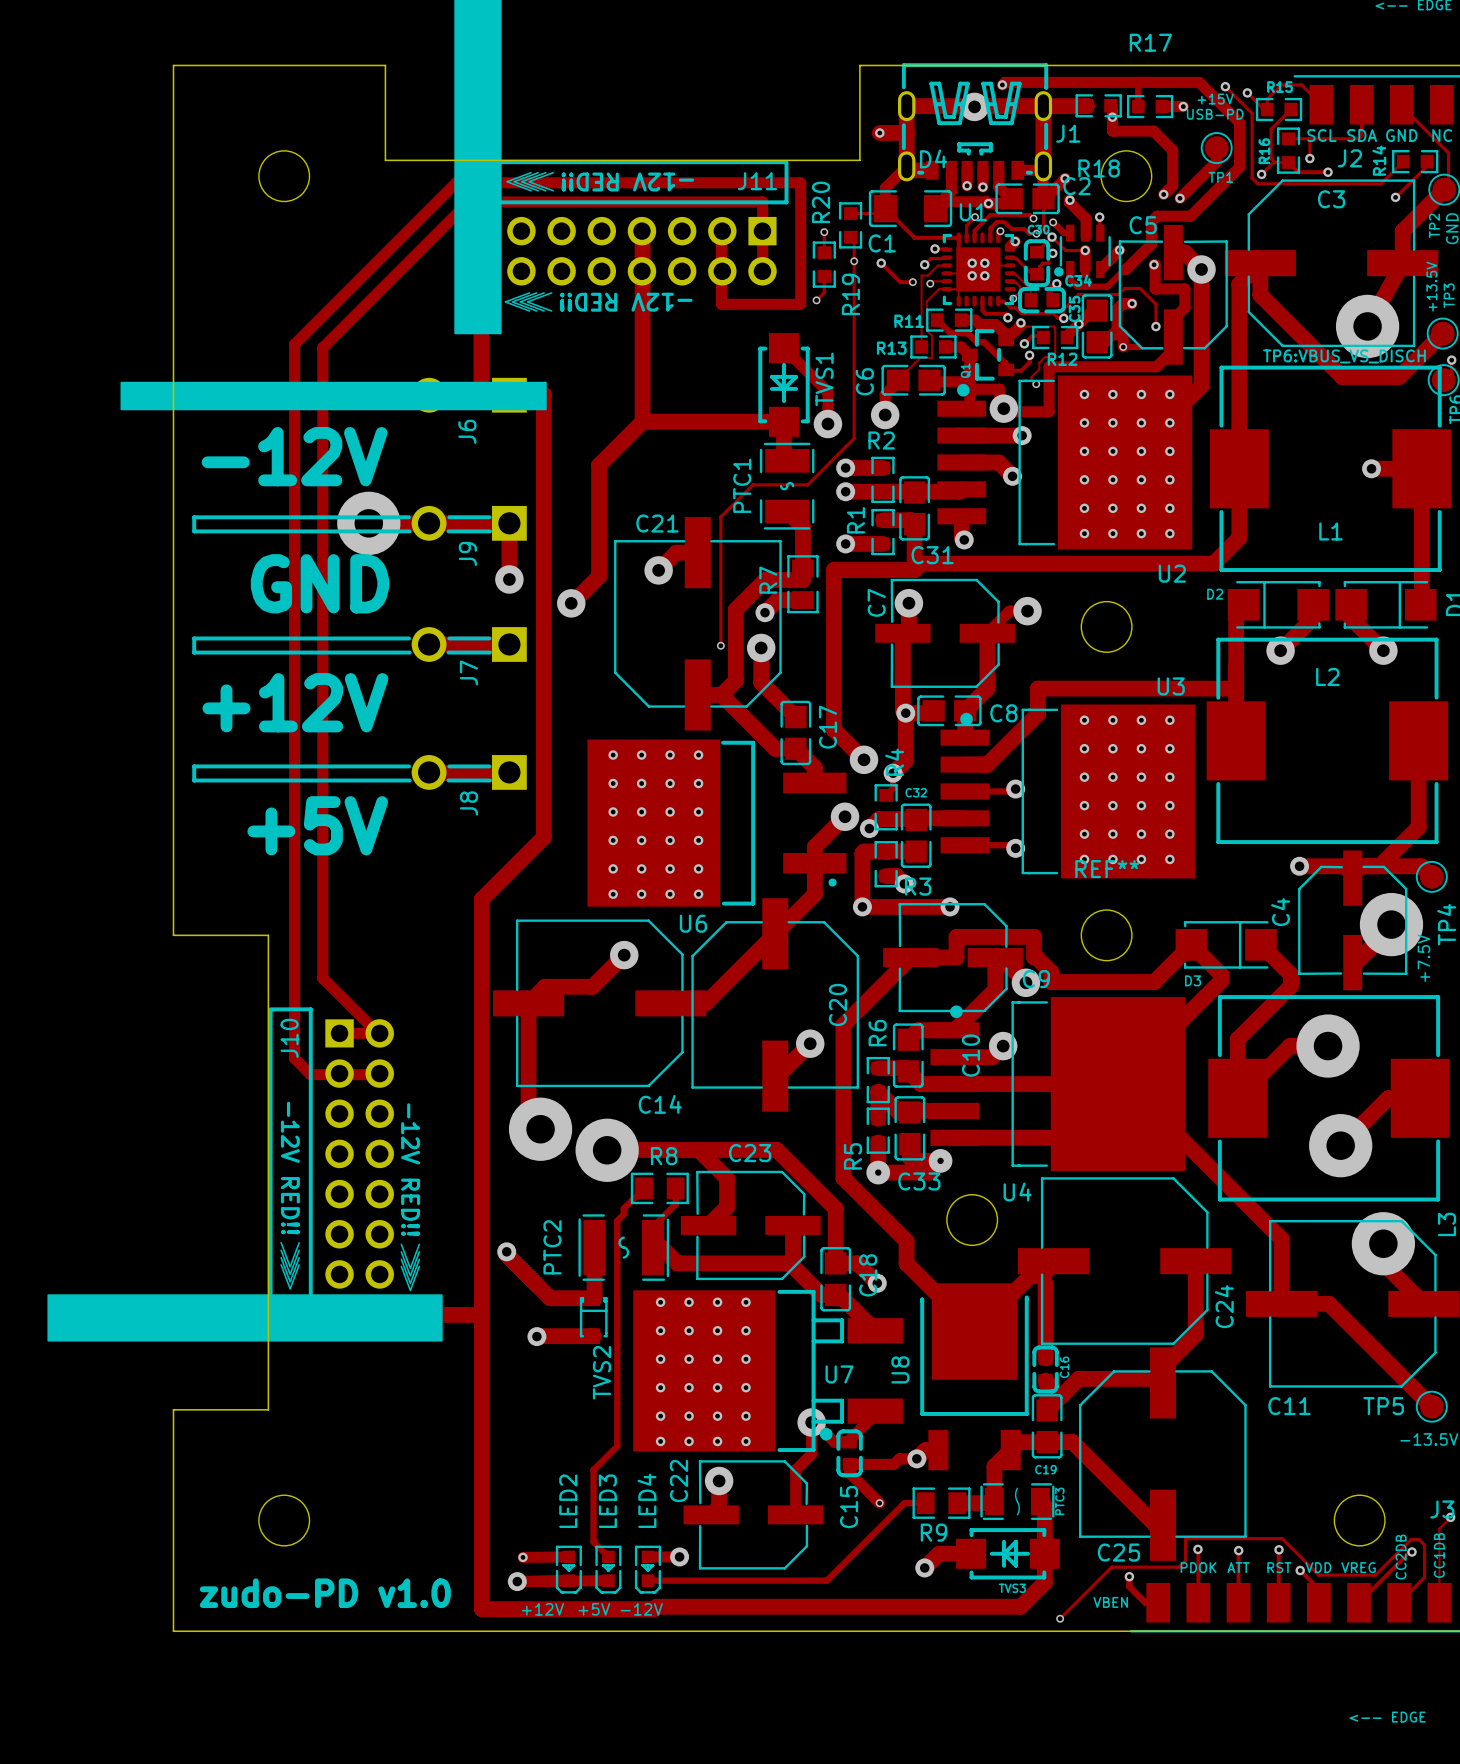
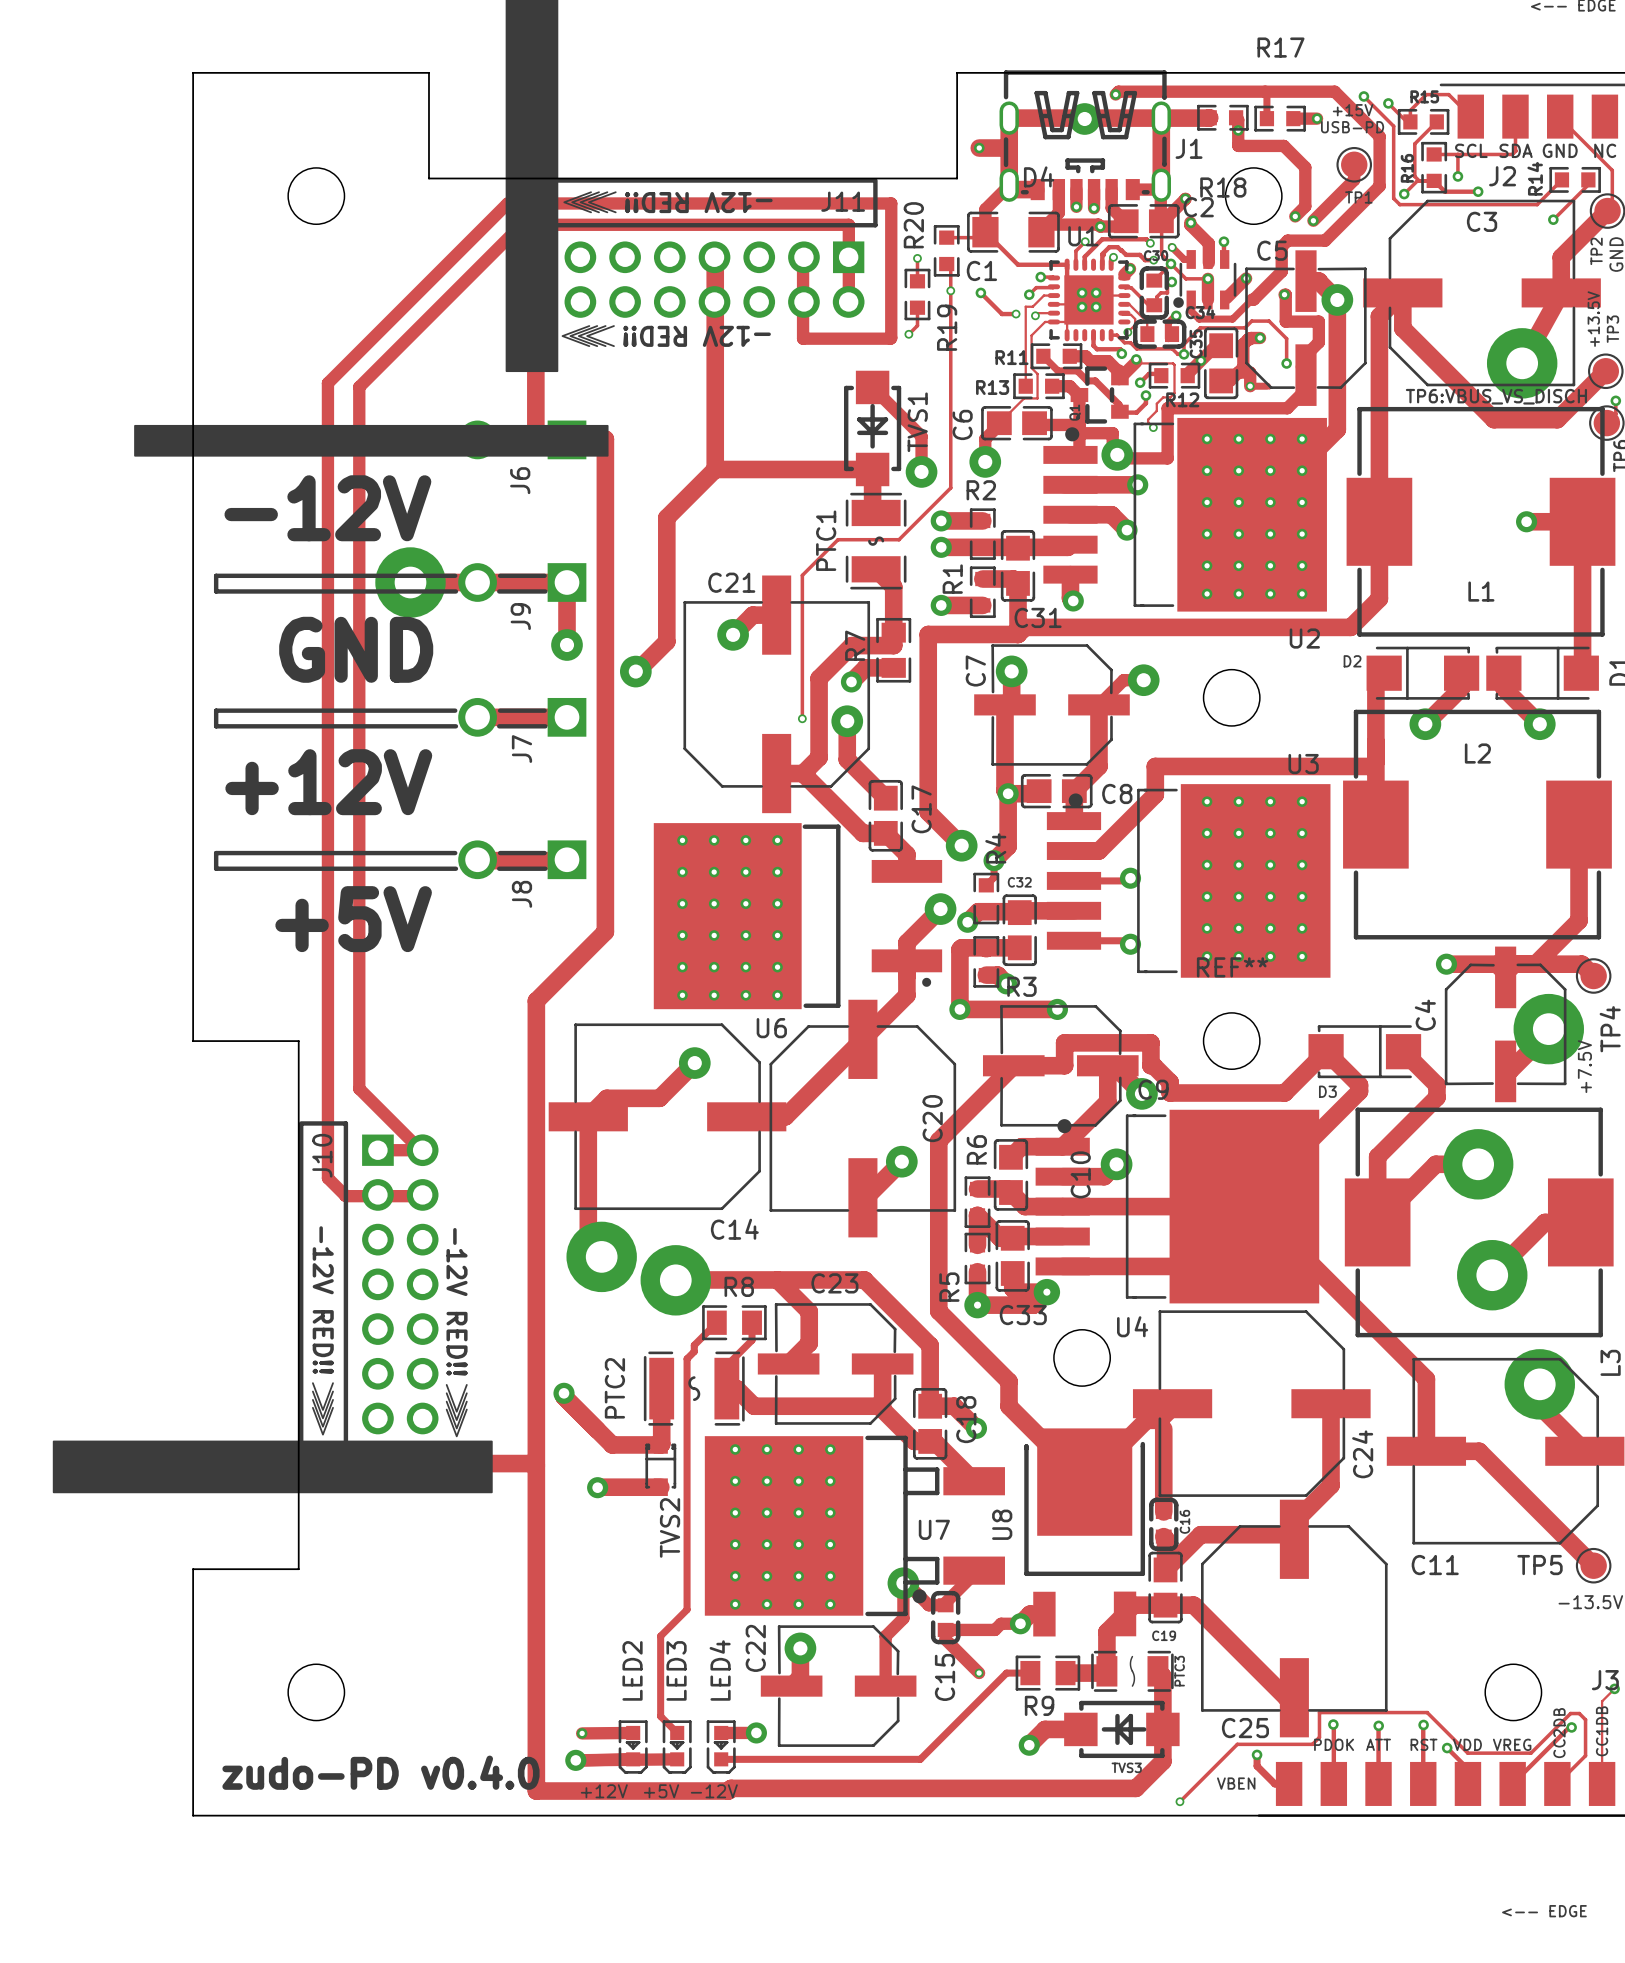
text: zudo-PD v1.0 (325, 1593) -> zudo-PD v0.4.0 (380, 1772)

